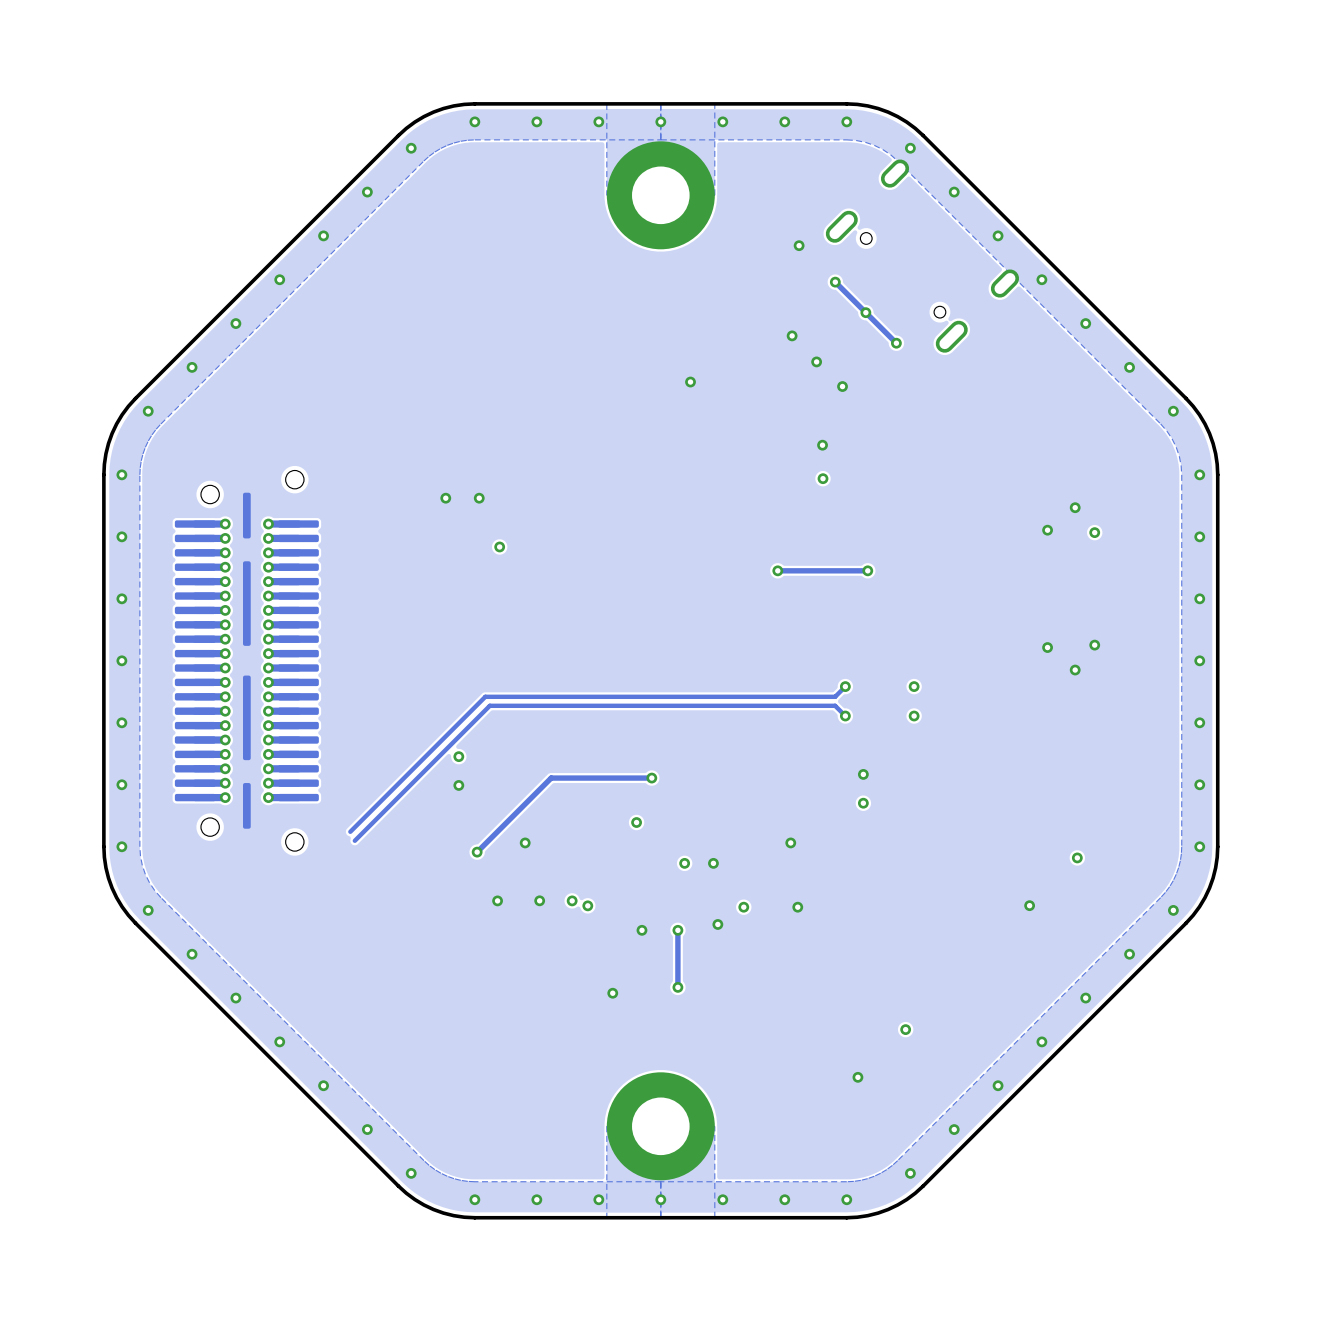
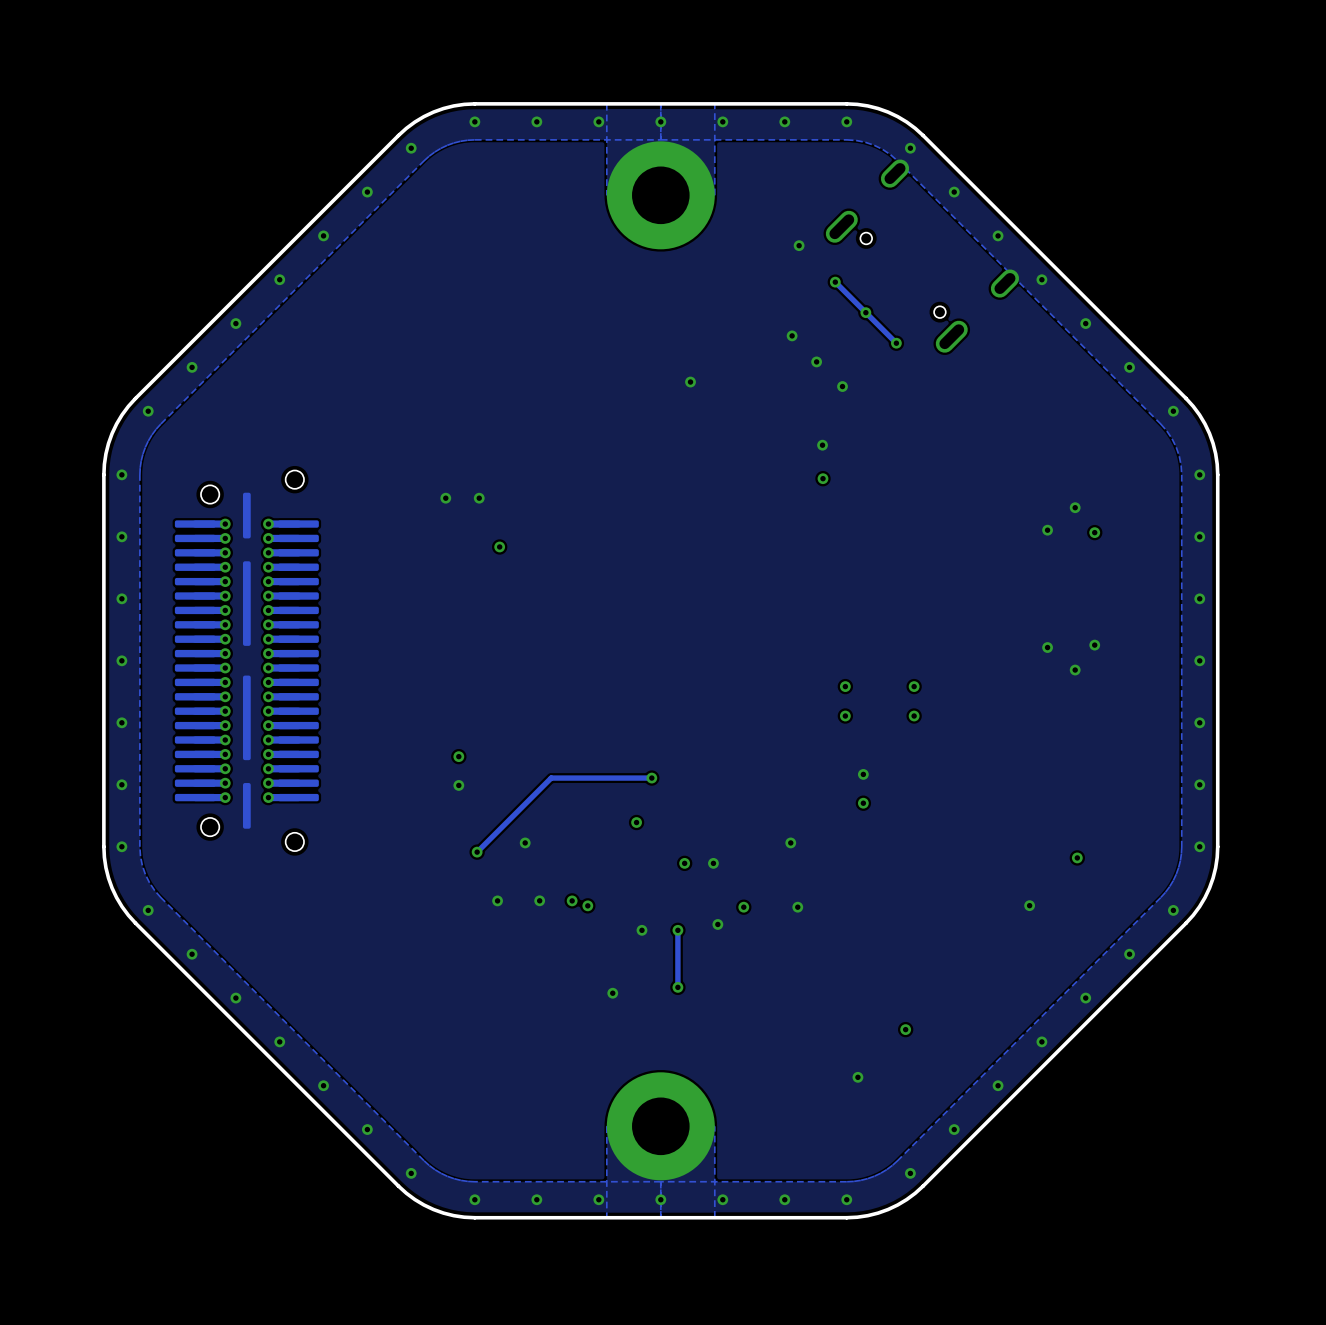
via: (777, 570) -> none
track: (867, 570) (777, 570) -> none
via: (867, 570) -> none
track: (845, 686) (835, 696) (485, 696) (350, 831) -> none
track: (845, 716) (835, 705) (489, 705) (354, 840) -> none

